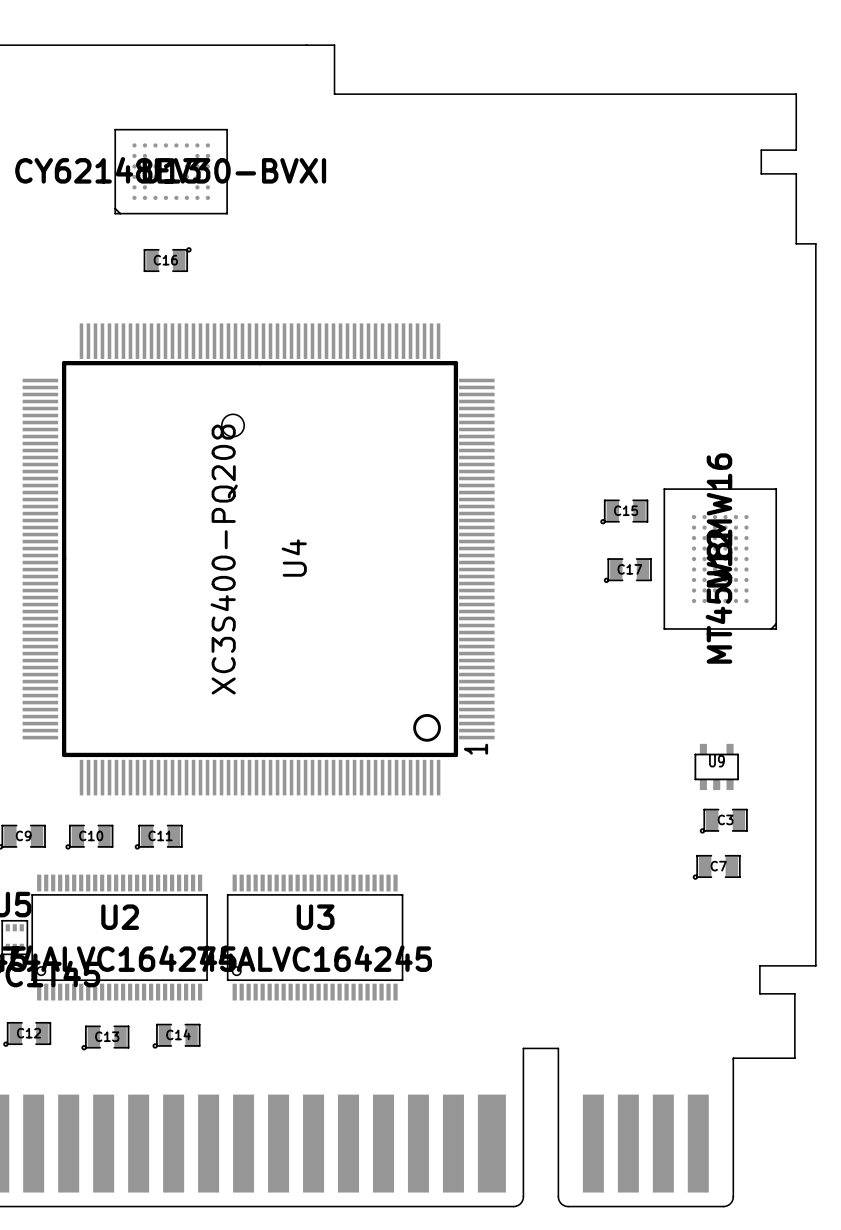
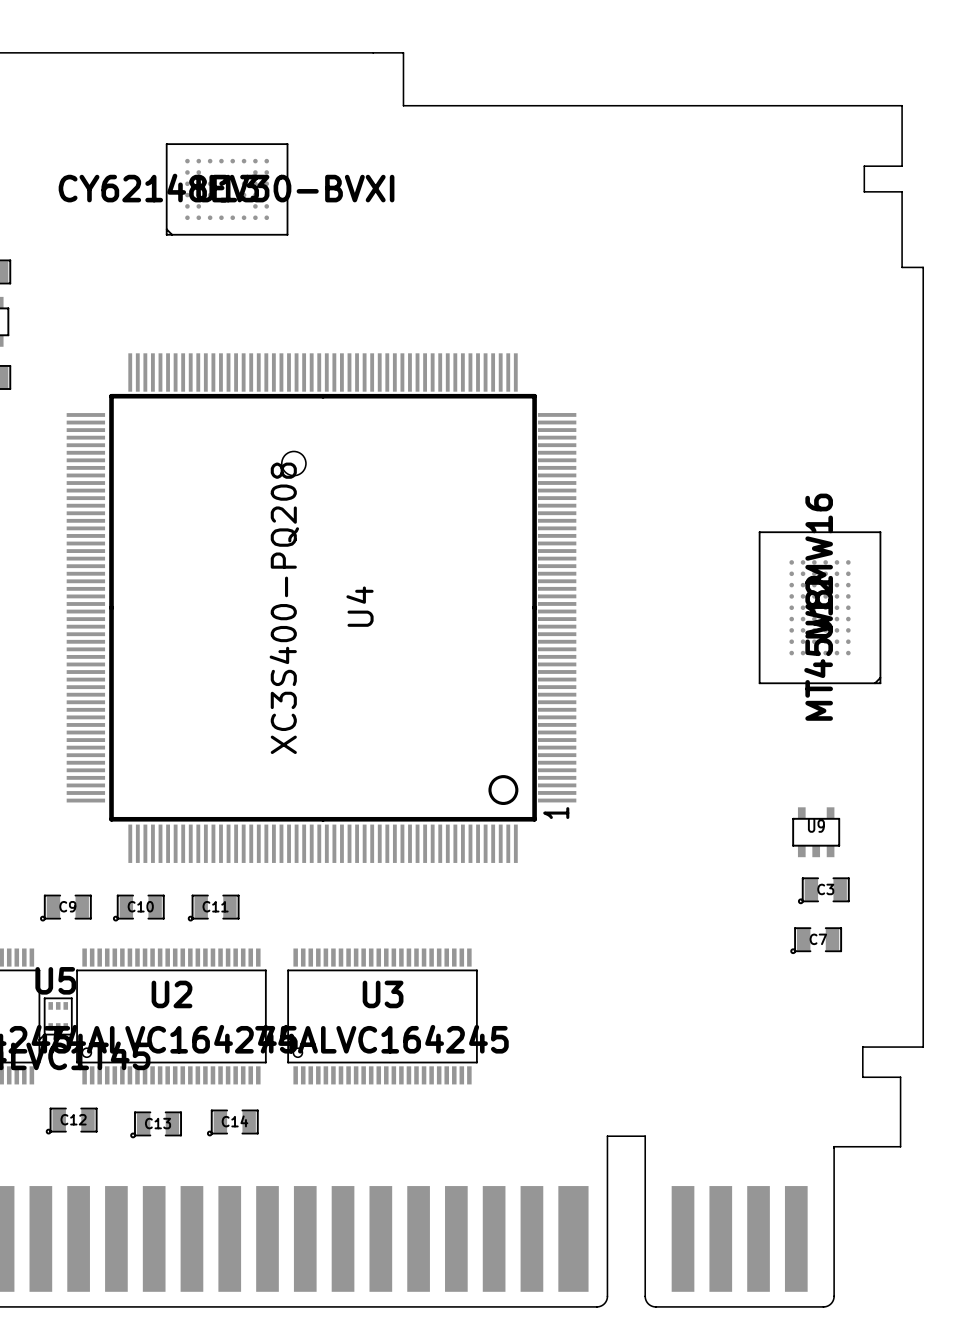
C16: (167, 259) -> none
C15: (624, 511) -> none
C17: (627, 570) -> none

